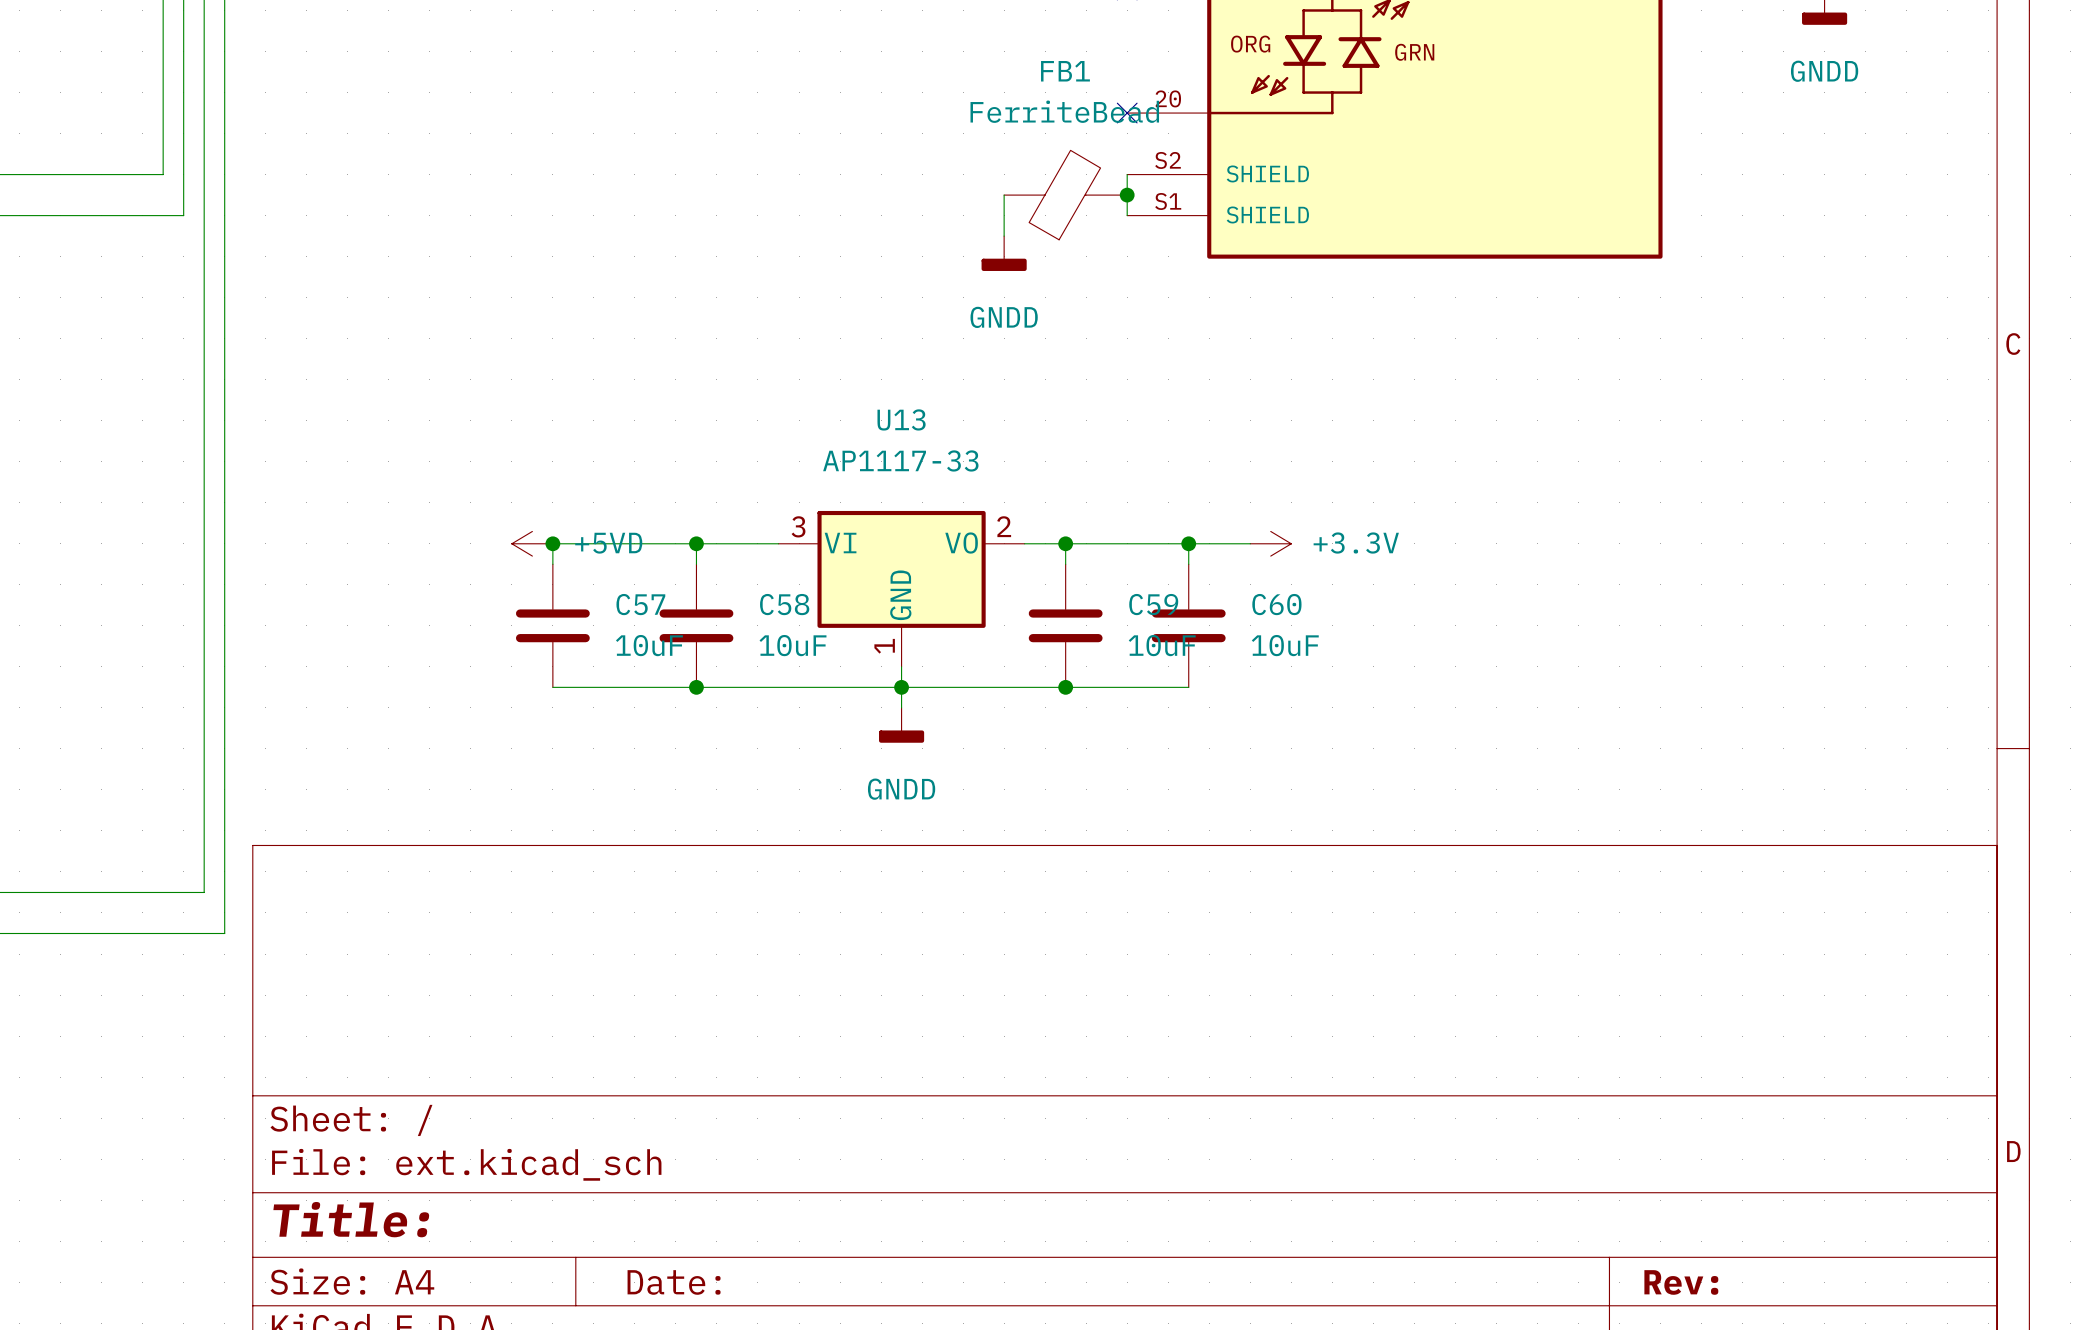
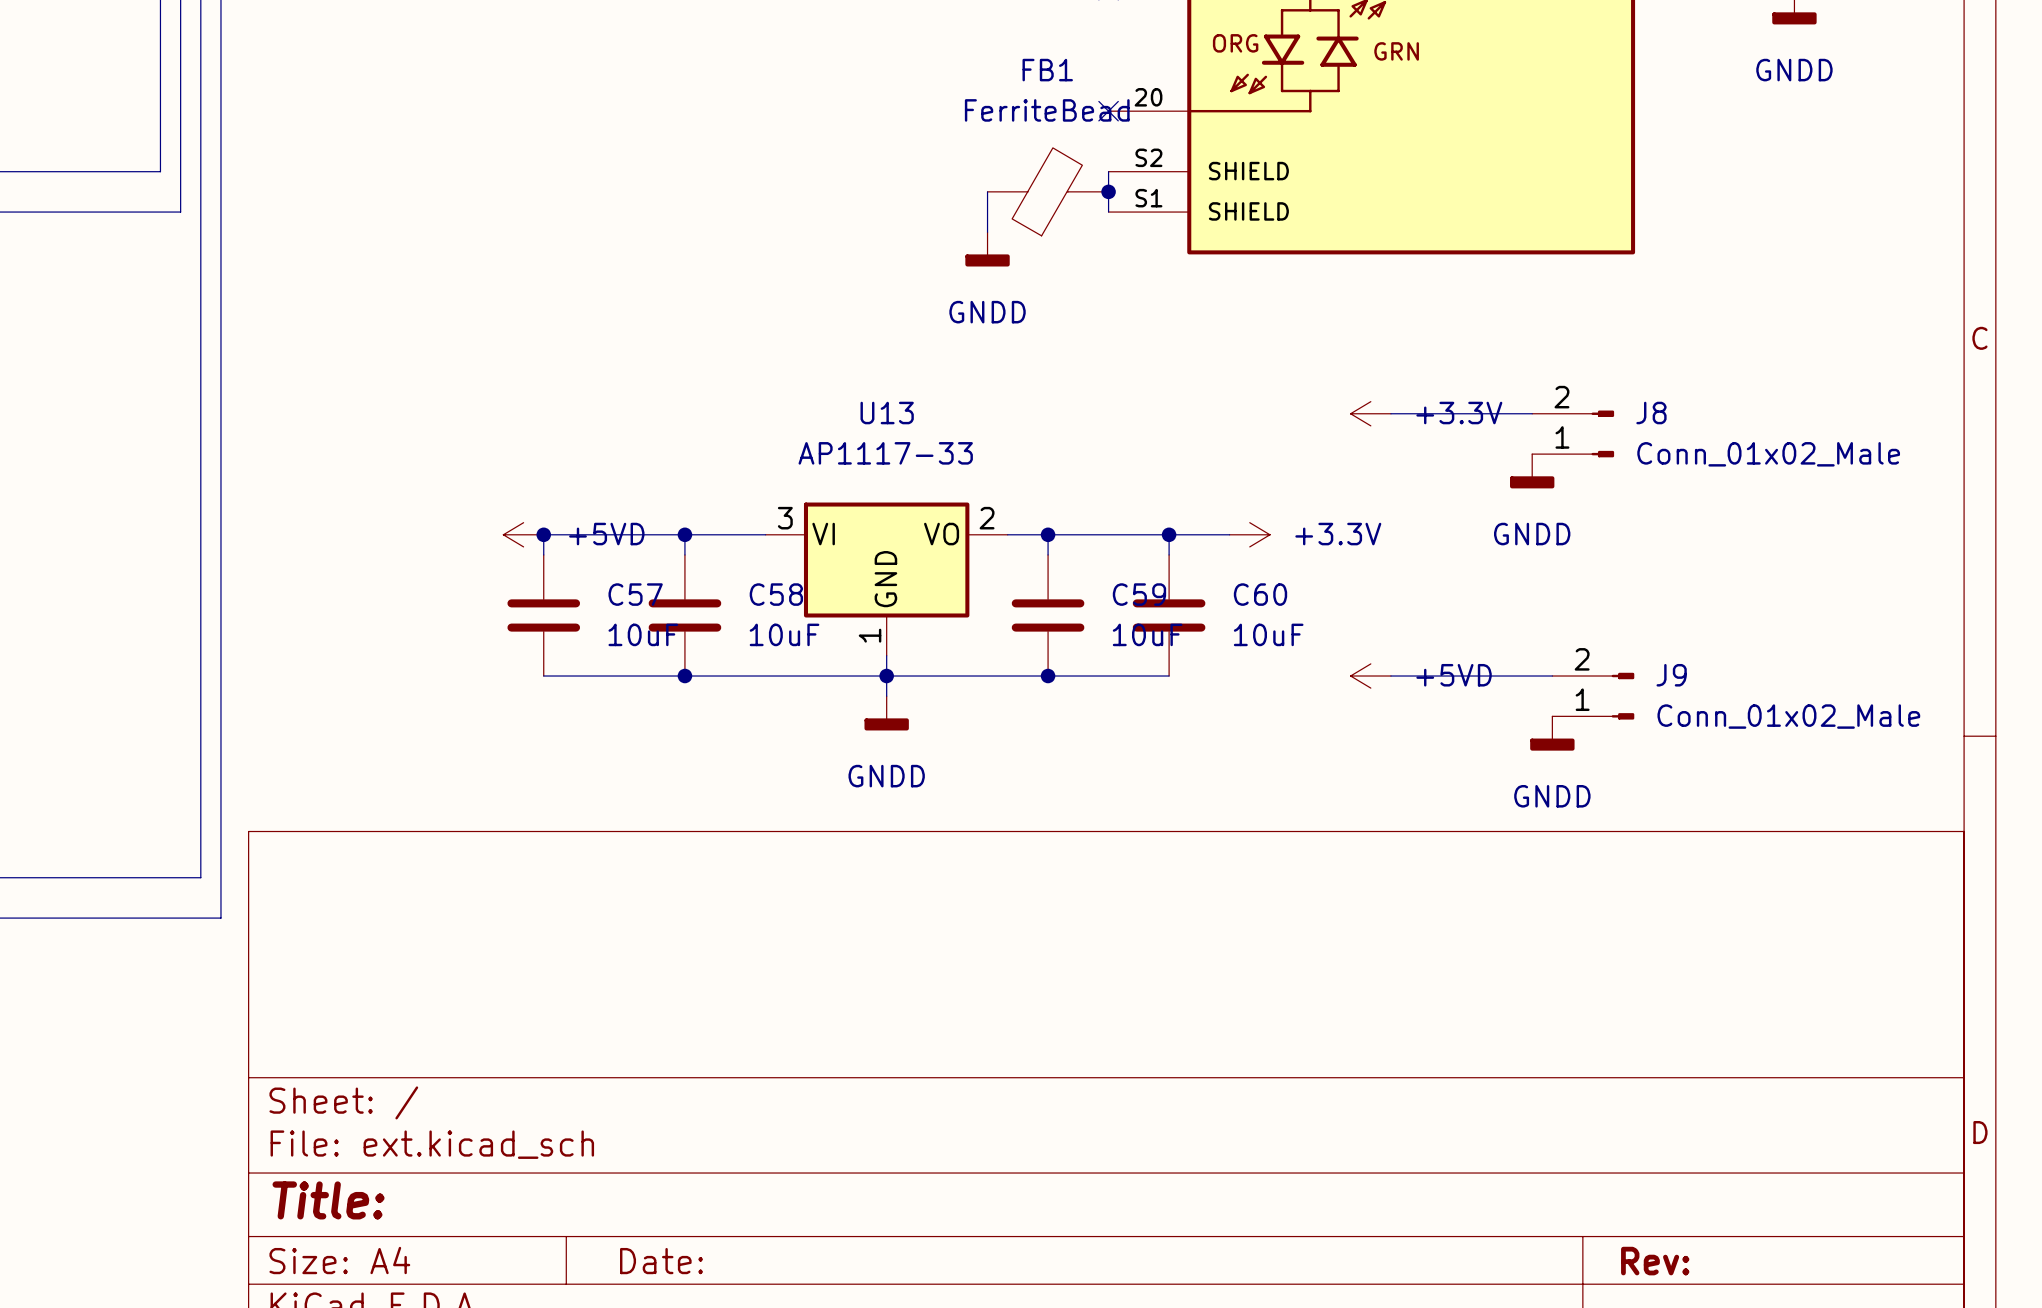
power symbol: none -> +3.3V (1370, 413)
wire: none -> (1390, 413) (1532, 413)
J8: none -> Conn_01x02_Male (1573, 433)
power symbol: none -> GNDD (1532, 471)
power symbol: none -> +5VD (1370, 676)
wire: none -> (1390, 676) (1552, 676)
J9: none -> Conn_01x02_Male (1593, 696)
power symbol: none -> GNDD (1552, 733)

